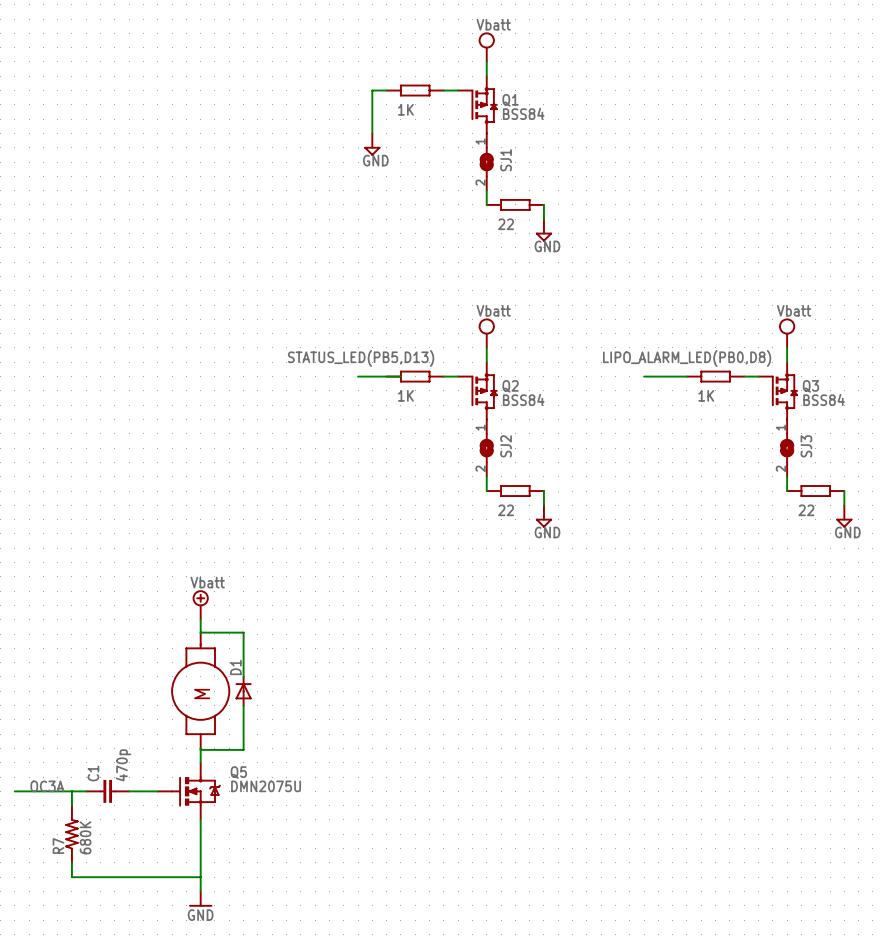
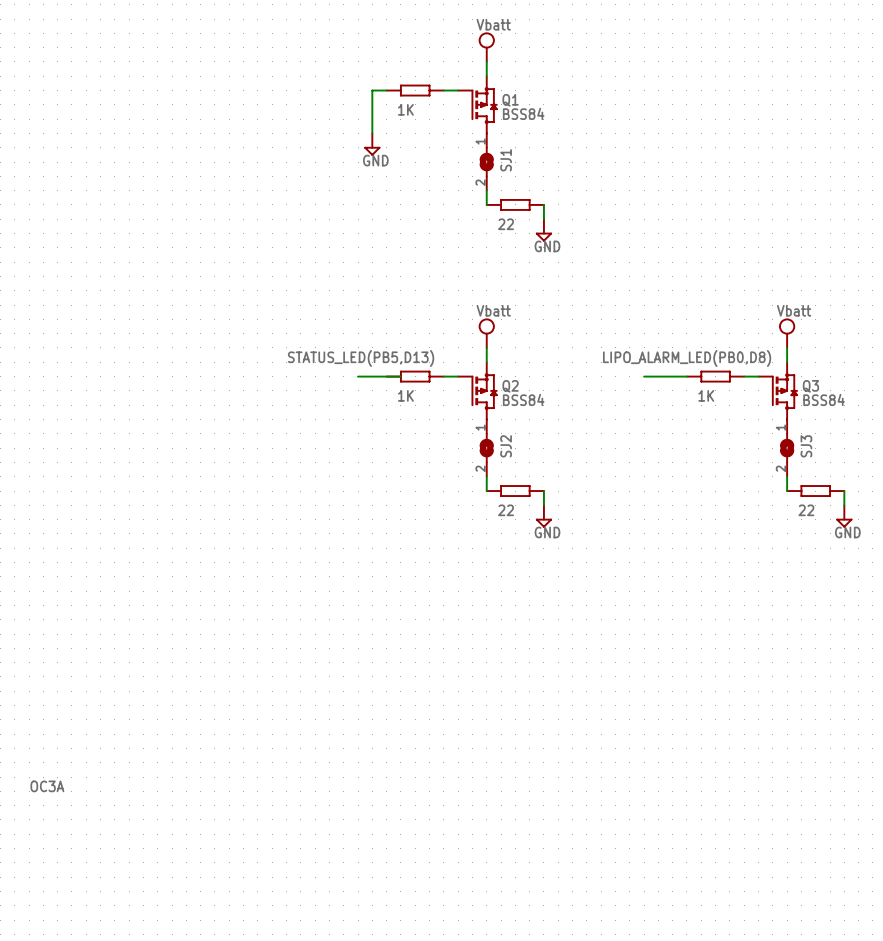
power symbol: Vbatt (200, 605) -> none
wire: (200, 619) (200, 634) -> none
wire: (200, 632) (243, 632) (243, 676) -> none
part: (200, 691) -> none
D1: (243, 691) -> none
wire: (243, 705) (243, 749) (200, 749) -> none
wire: (200, 748) (200, 762) -> none
wire: (14, 791) (86, 791) -> none
wire: (71, 791) (71, 805) -> none
C1: 470p (107, 791) -> none
wire: (129, 791) (157, 791) -> none
Q5: DMN2075U (189, 791) -> none
wire: (200, 819) (200, 891) -> none
R7: 680K (71, 834) -> none
wire: (71, 862) (71, 877) (200, 877) -> none
power symbol: GND (200, 899) -> none

